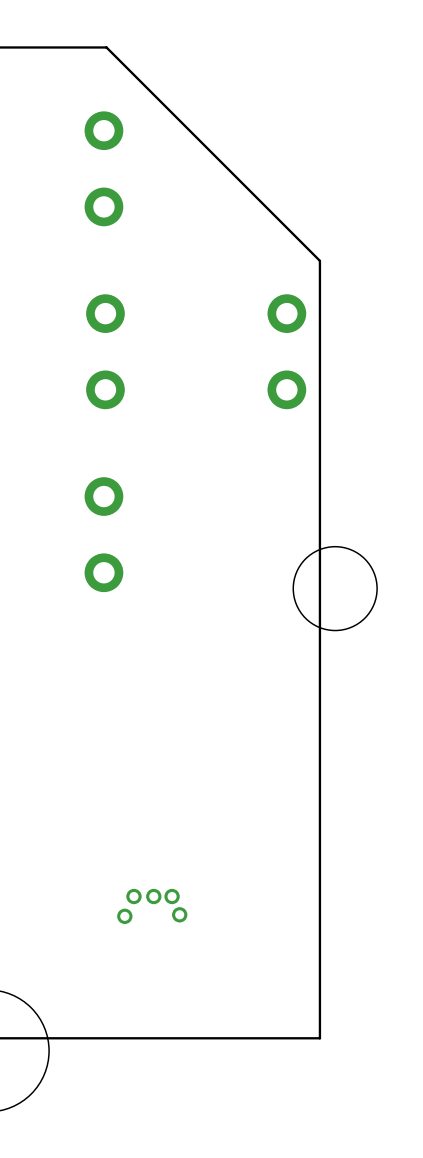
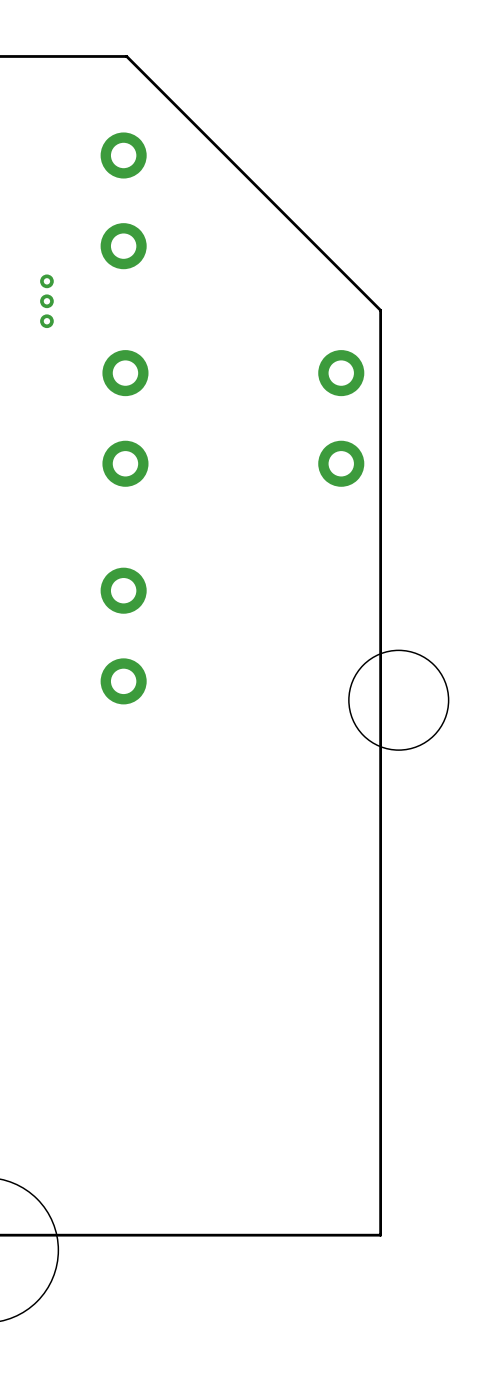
via: none -> (46, 281)
via: none -> (46, 301)
via: none -> (46, 321)
via: (133, 896) -> none
via: (153, 896) -> none
via: (172, 896) -> none
via: (179, 914) -> none
via: (124, 916) -> none

